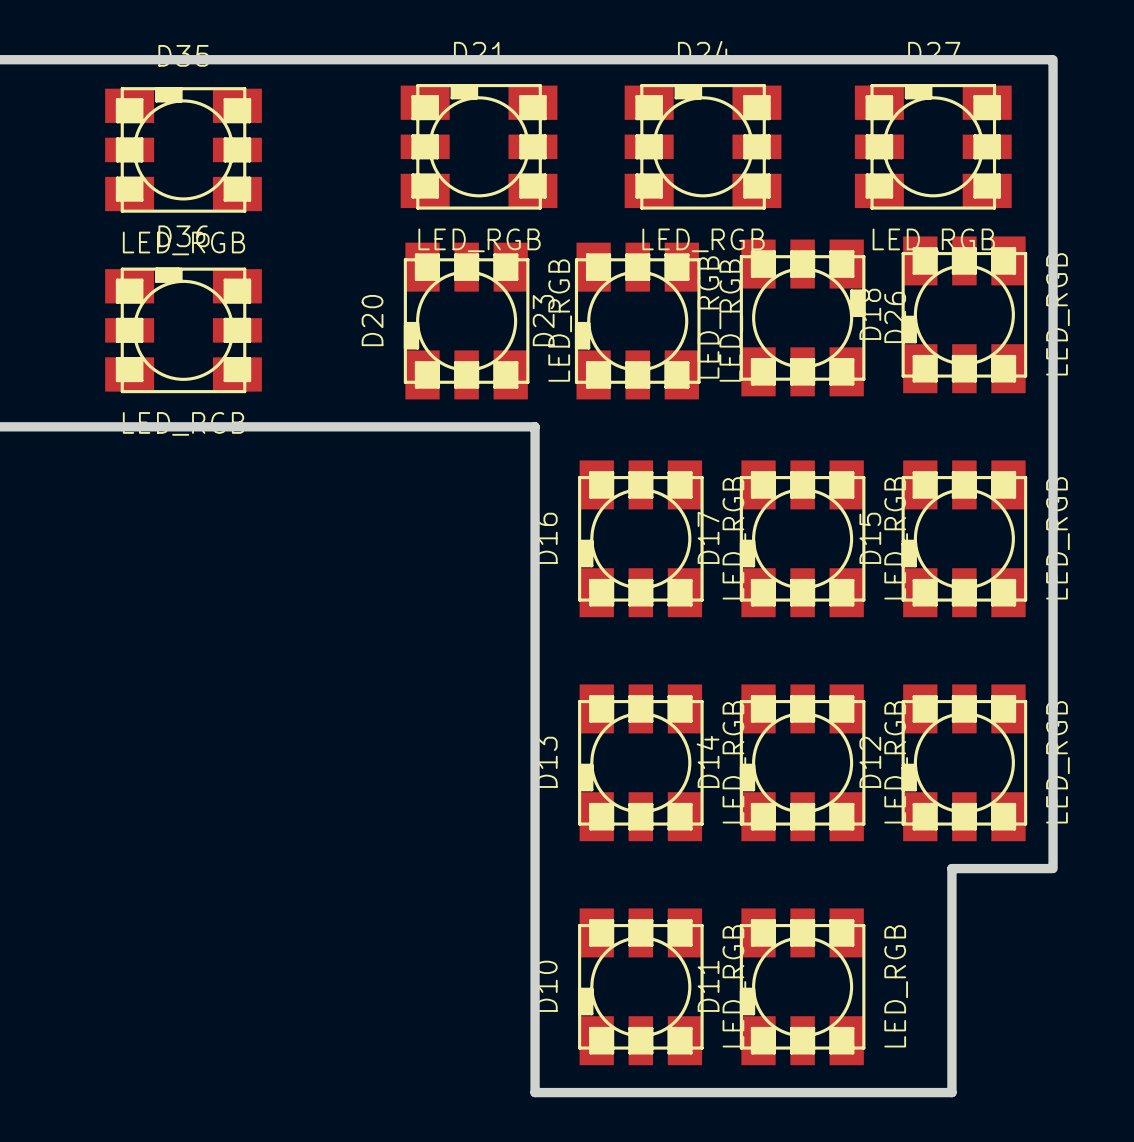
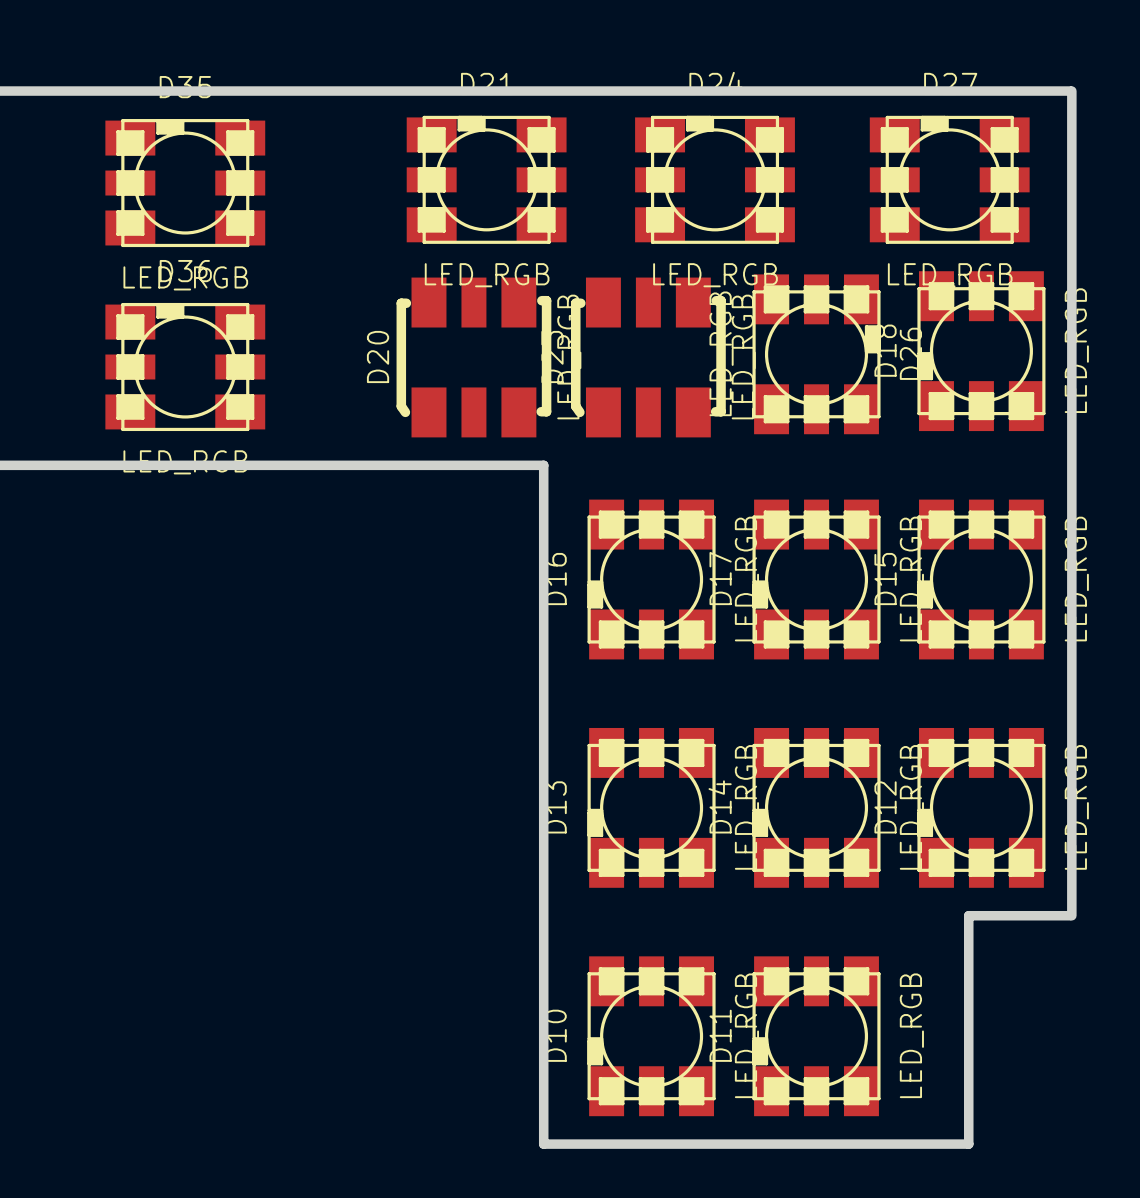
D20 footprint: [403, 242, 530, 400] -> [396, 277, 552, 438]
D23 footprint: [574, 242, 701, 400] -> [571, 277, 726, 438]

